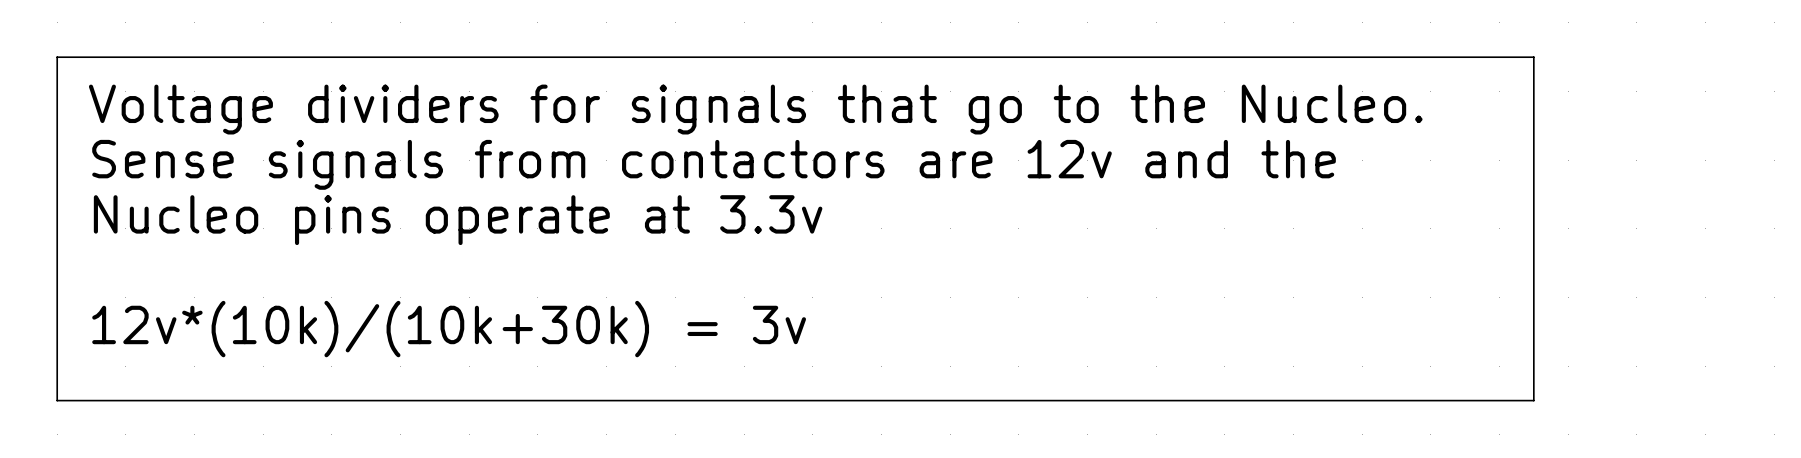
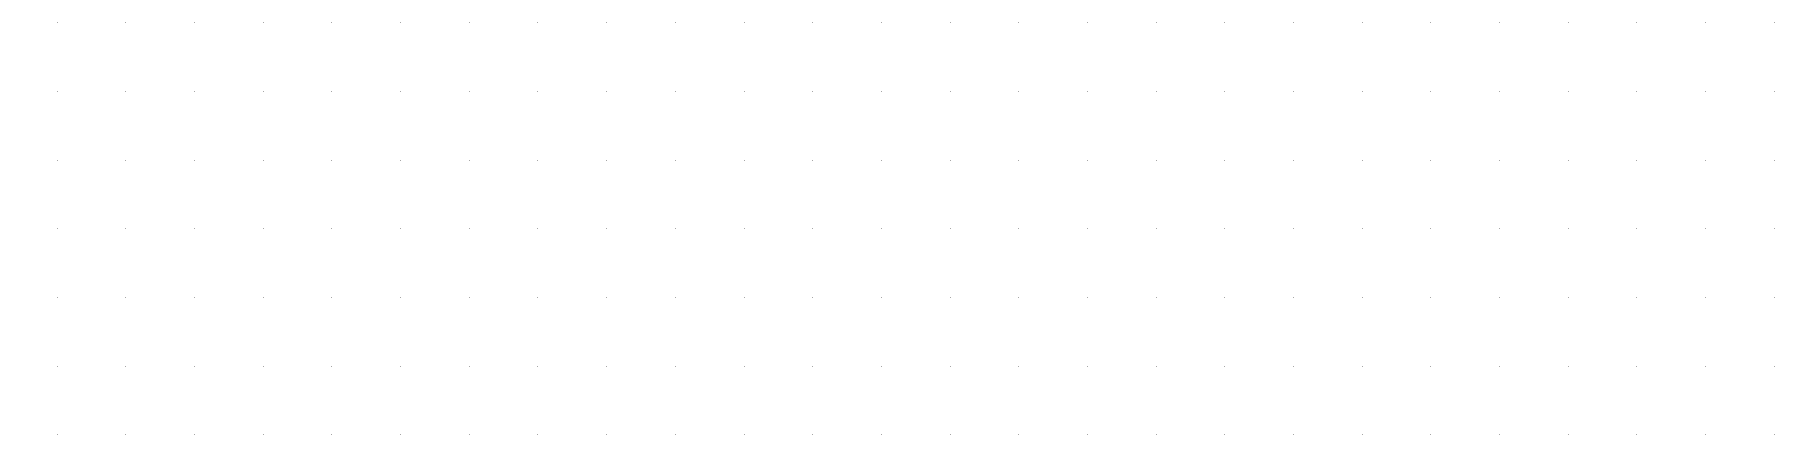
line: (57, 57) (1533, 57) (1533, 400) (57, 400) (57, 57) -> none
text: Voltage dividers for signals that go to the Nucleo. (755, 109) -> none
text: Sense signals from contactors are 12v and the (714, 164) -> none
text: Nucleo pins operate at 3.3v (458, 220) -> none
text: 12v*(10k)/(10k+30k) = 3v (449, 329) -> none

